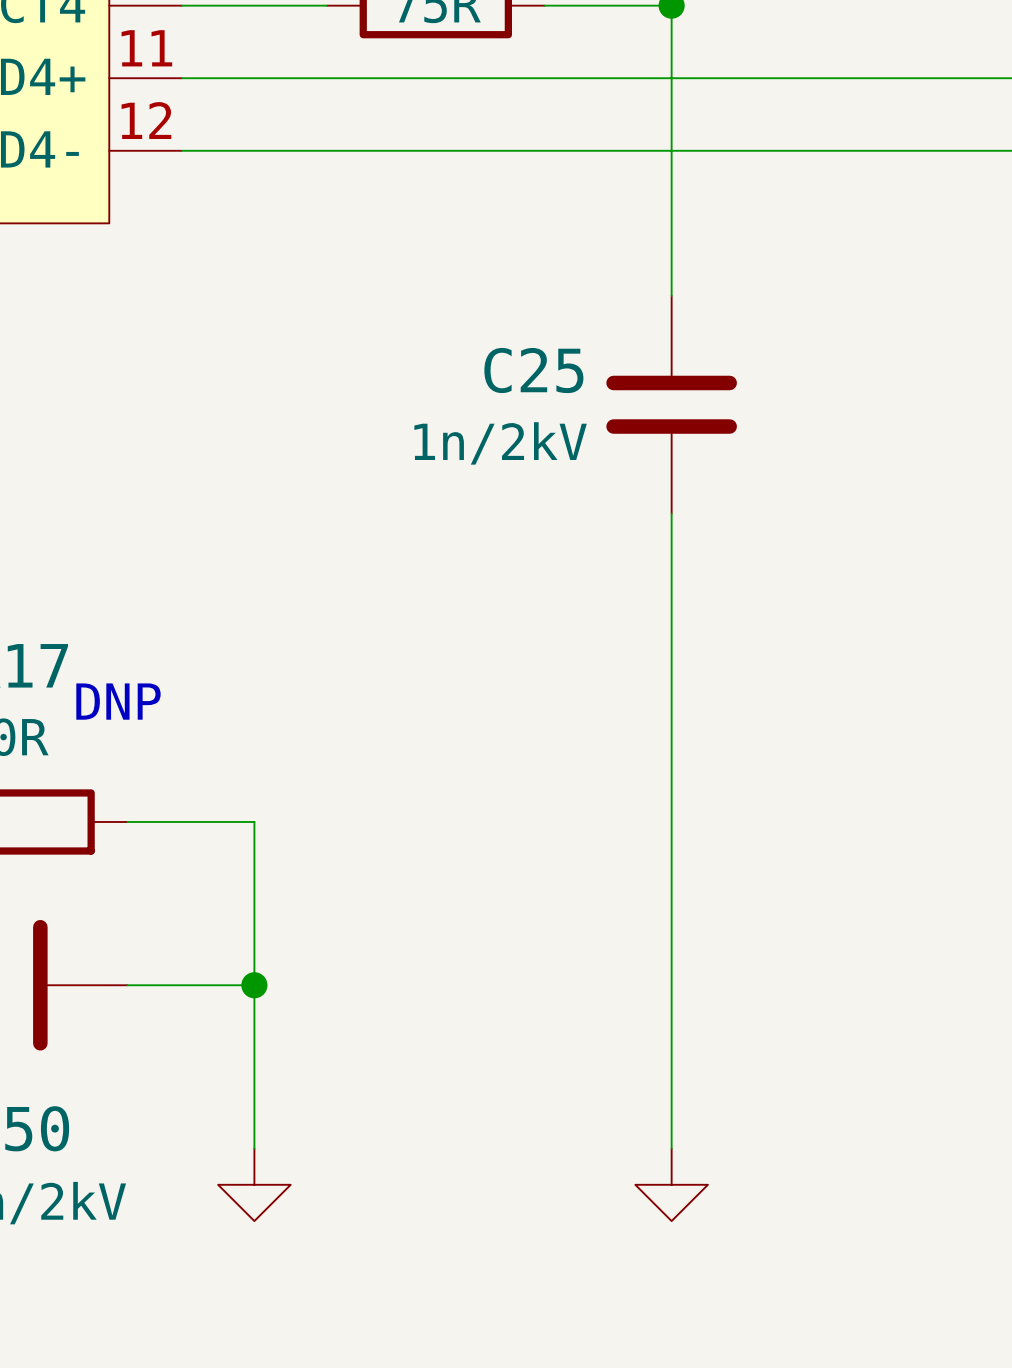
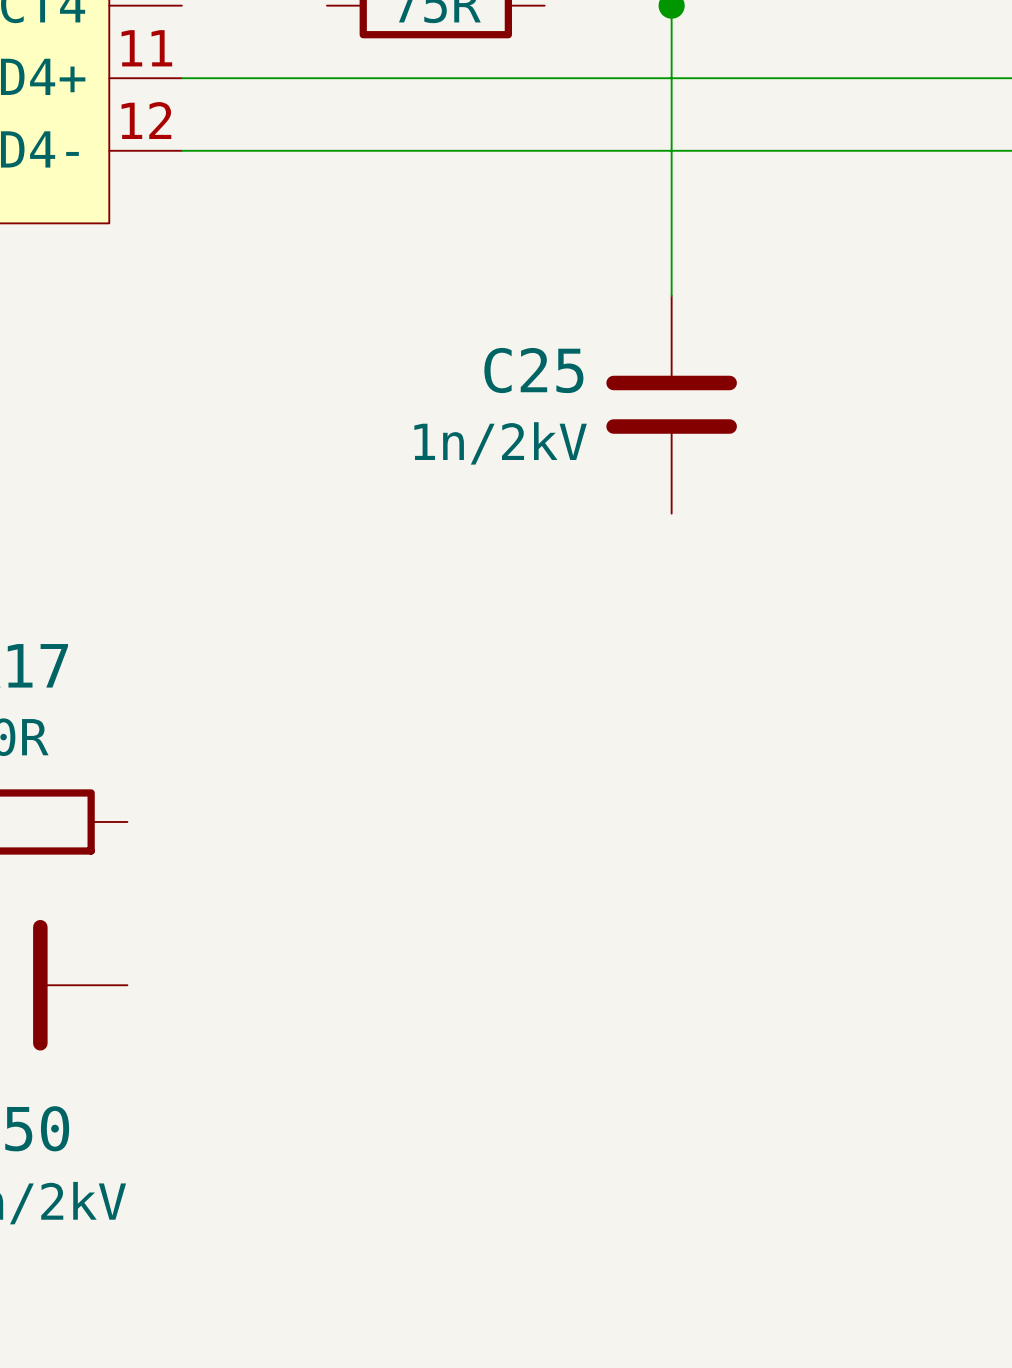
wire: (181, 5) (326, 5) -> none
wire: (544, 5) (671, 5) -> none
wire: (671, 513) (671, 1148) -> none
text: DNP (118, 701) -> none
wire: (127, 821) (254, 821) (254, 1148) -> none
wire: (127, 985) (254, 985) -> none
junction: (254, 985) -> none
power symbol: (254, 1184) -> none
power symbol: (671, 1184) -> none

